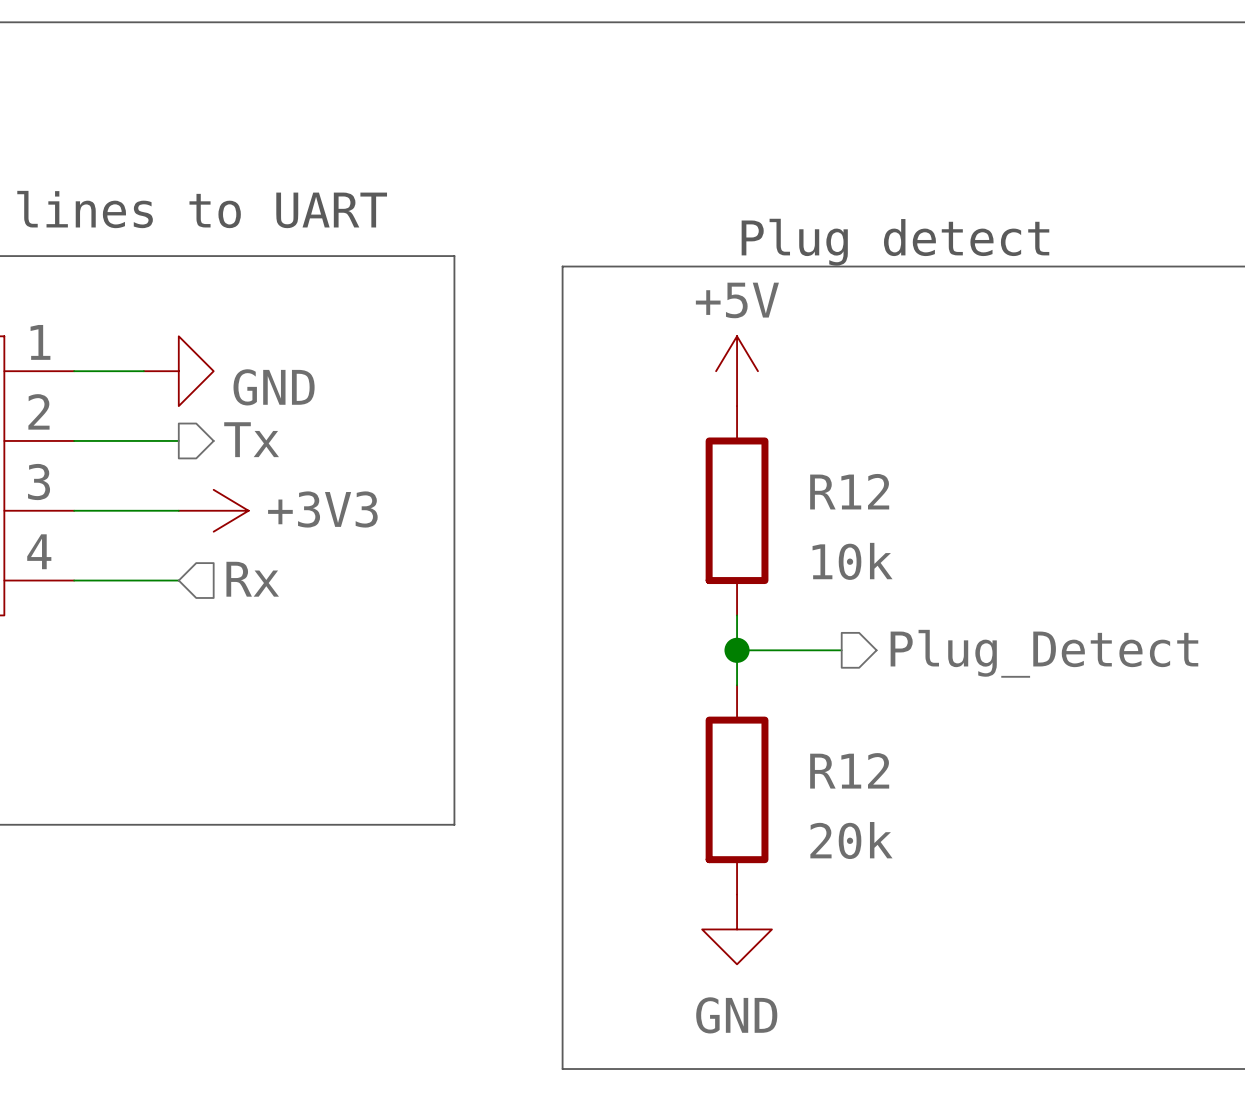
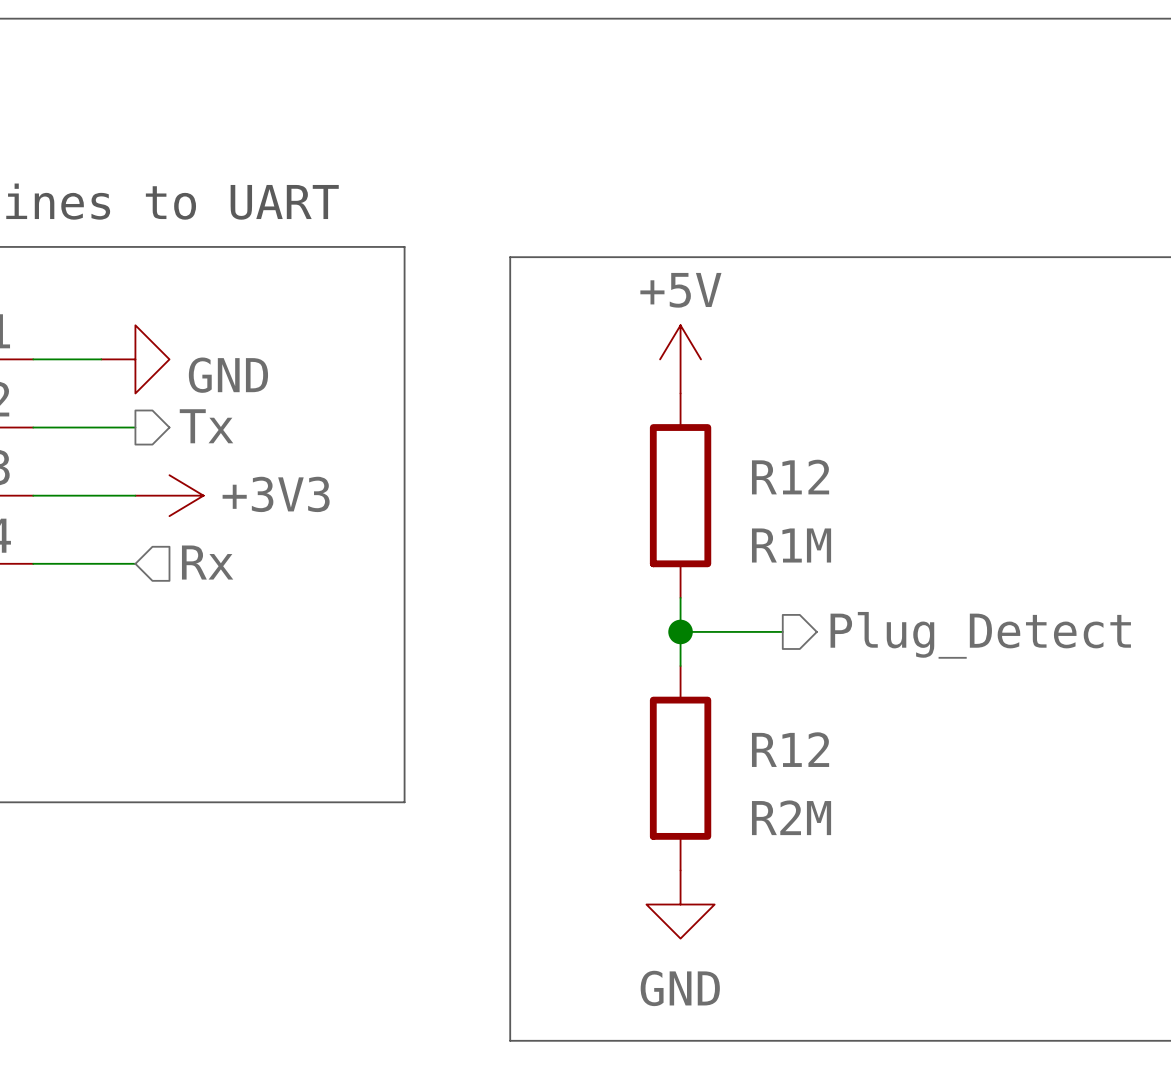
text: Plug detect (895, 242) -> none
R12 value: 10k (852, 561) -> R1M (791, 545)
R12 value: 20k (851, 840) -> R2M (791, 817)

